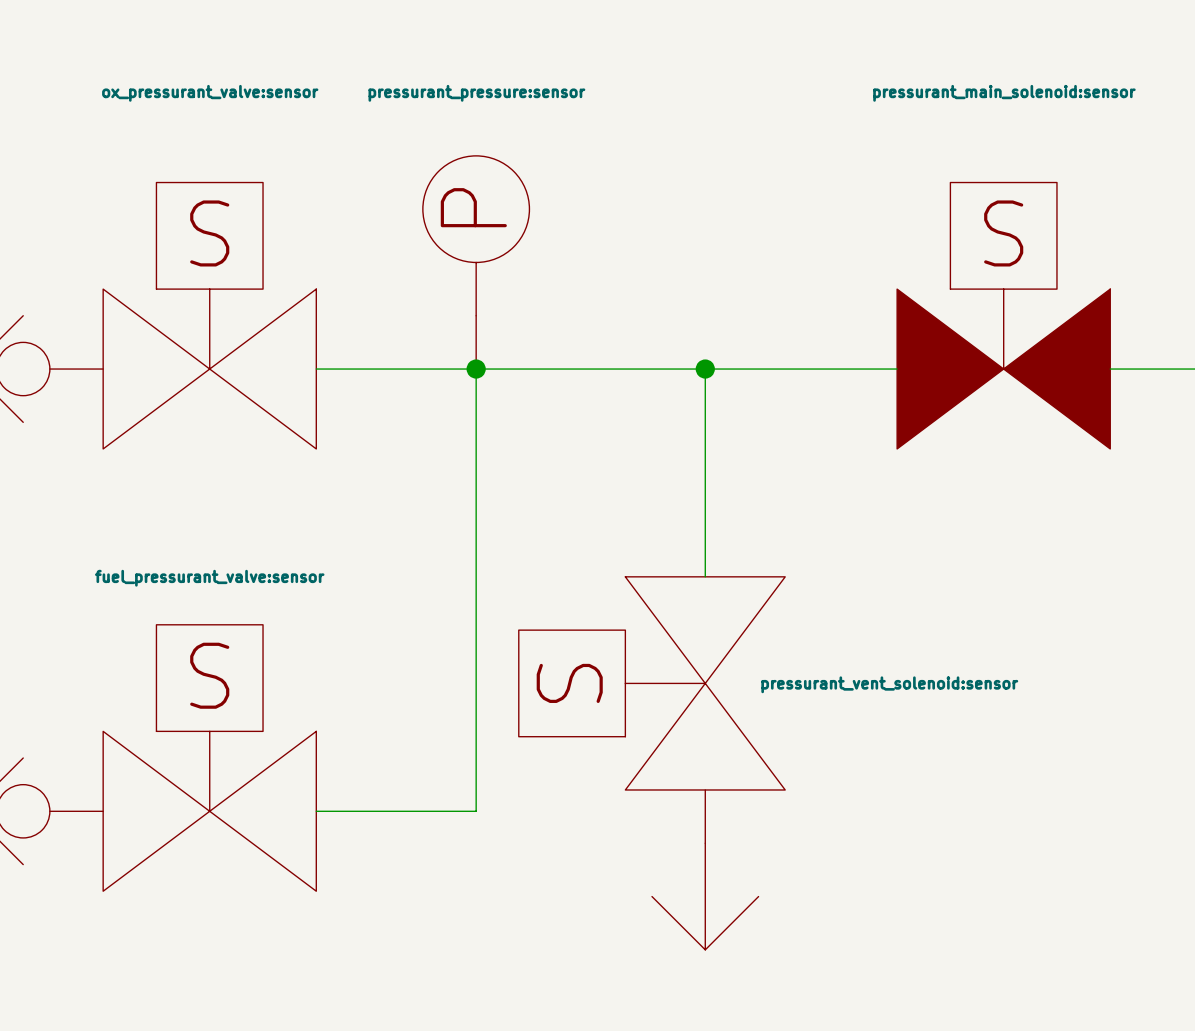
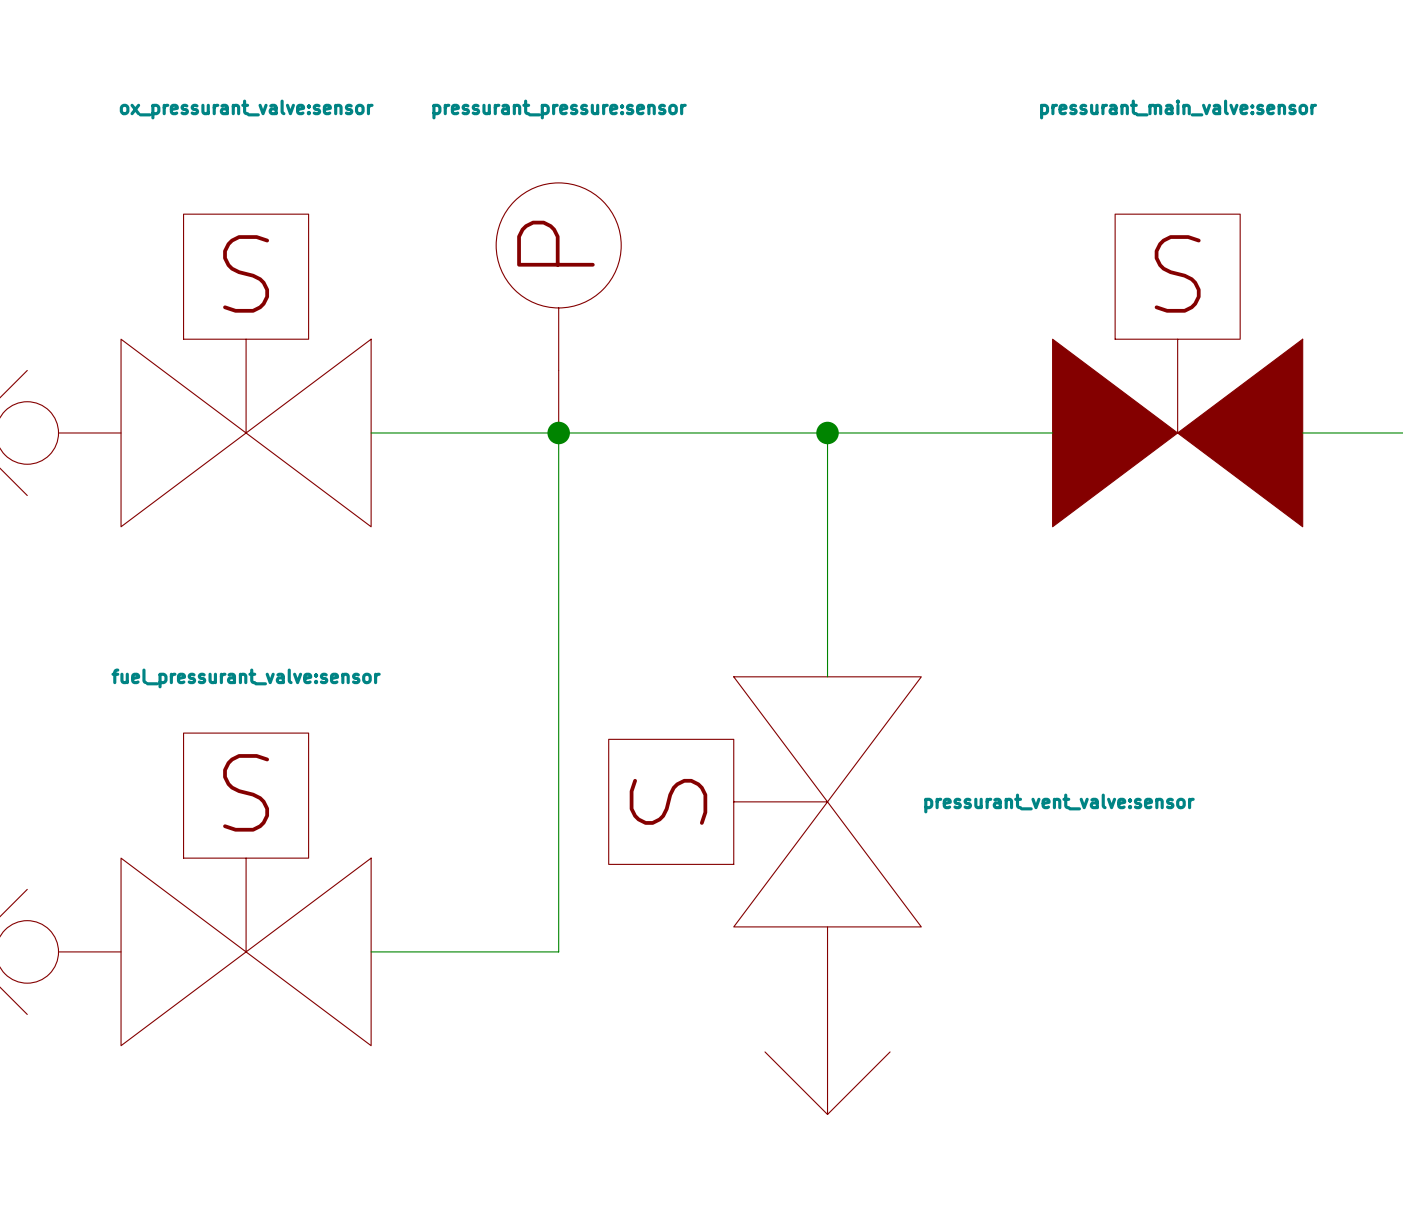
part value: pressurant_main_solenoid:sensor (1004, 93) -> pressurant_main_valve:sensor (1178, 109)
part value: pressurant_vent_solenoid:sensor (889, 684) -> pressurant_vent_valve:sensor (1059, 803)

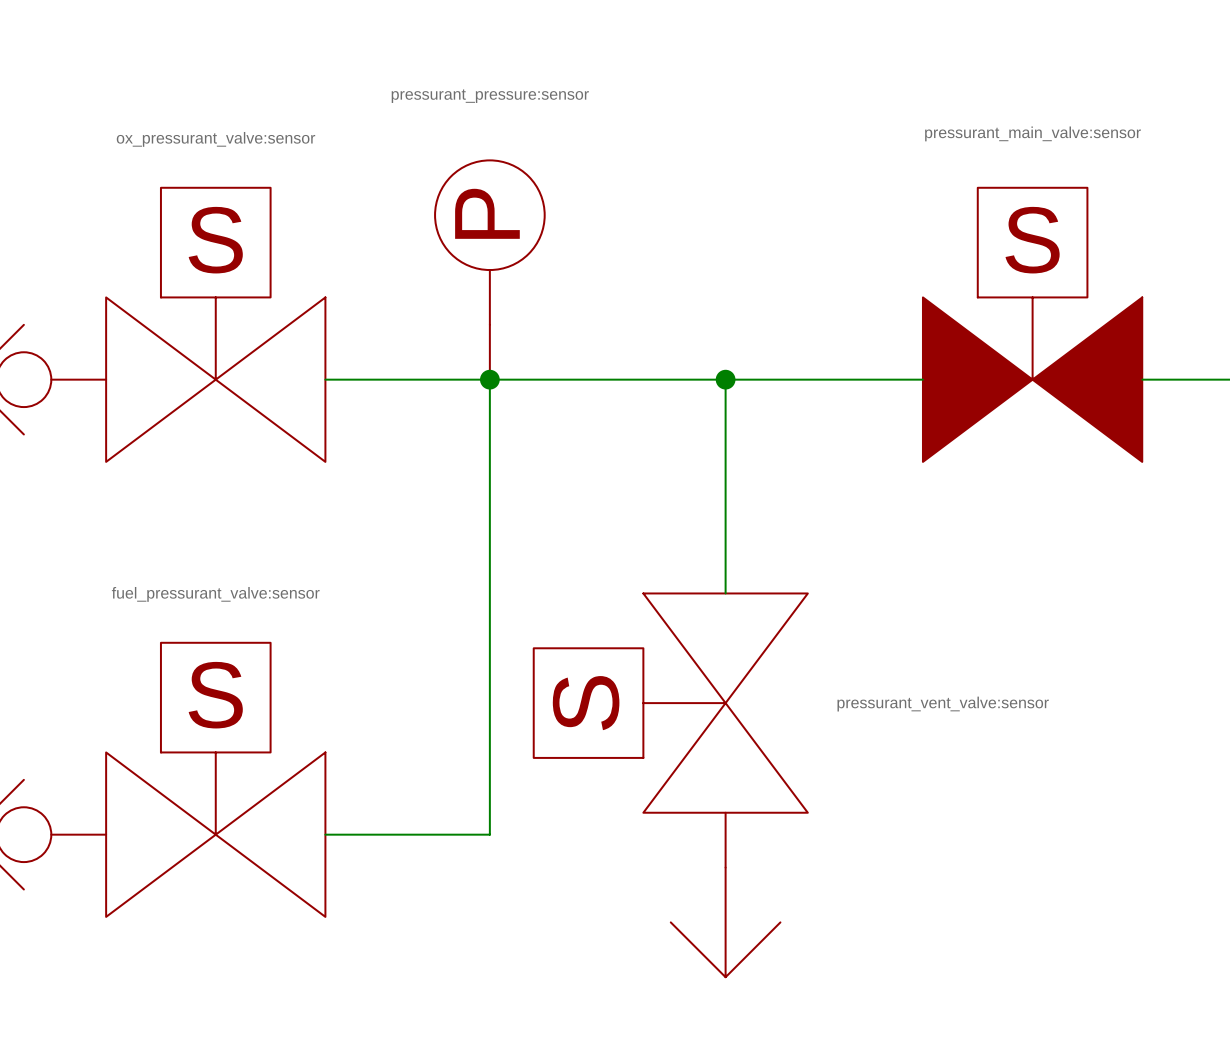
part value position: ox_pressurant_valve:sensor (246, 109) -> ox_pressurant_valve:sensor (215, 139)
part value position: pressurant_main_valve:sensor (1178, 109) -> pressurant_main_valve:sensor (1032, 133)

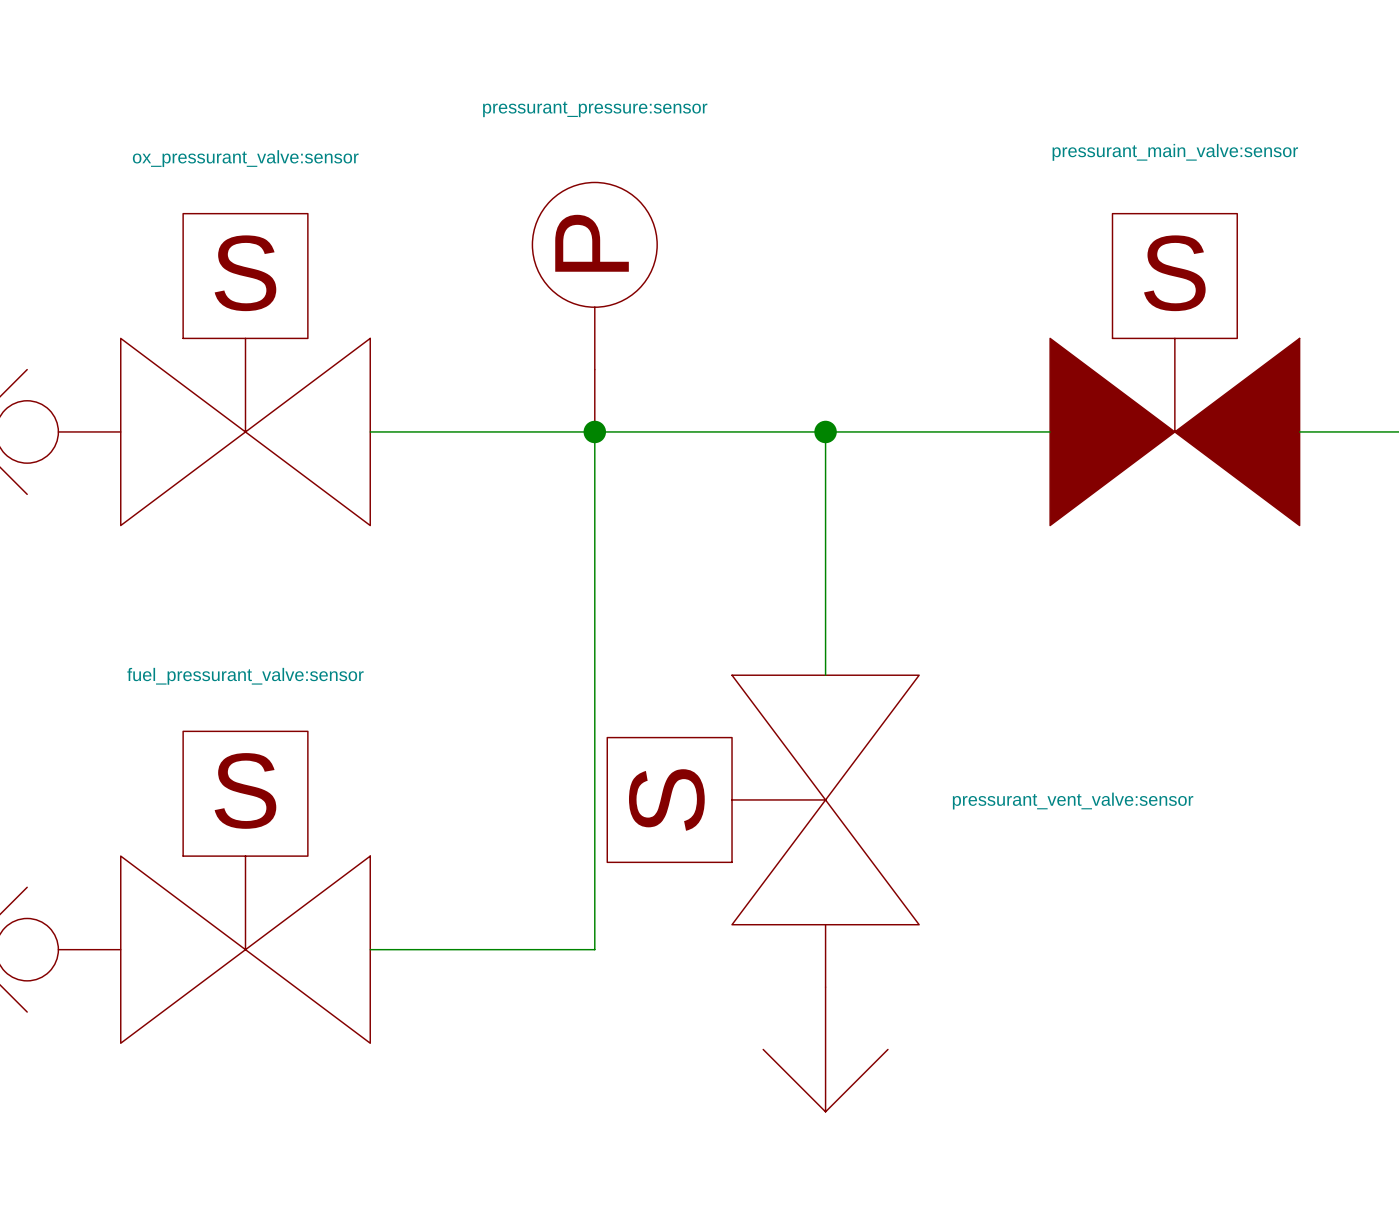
part position: (489, 270) -> (594, 307)
wire: (489, 379) (489, 834) -> (594, 431) (594, 949) (557, 949)
junction position: (489, 379) -> (594, 431)

